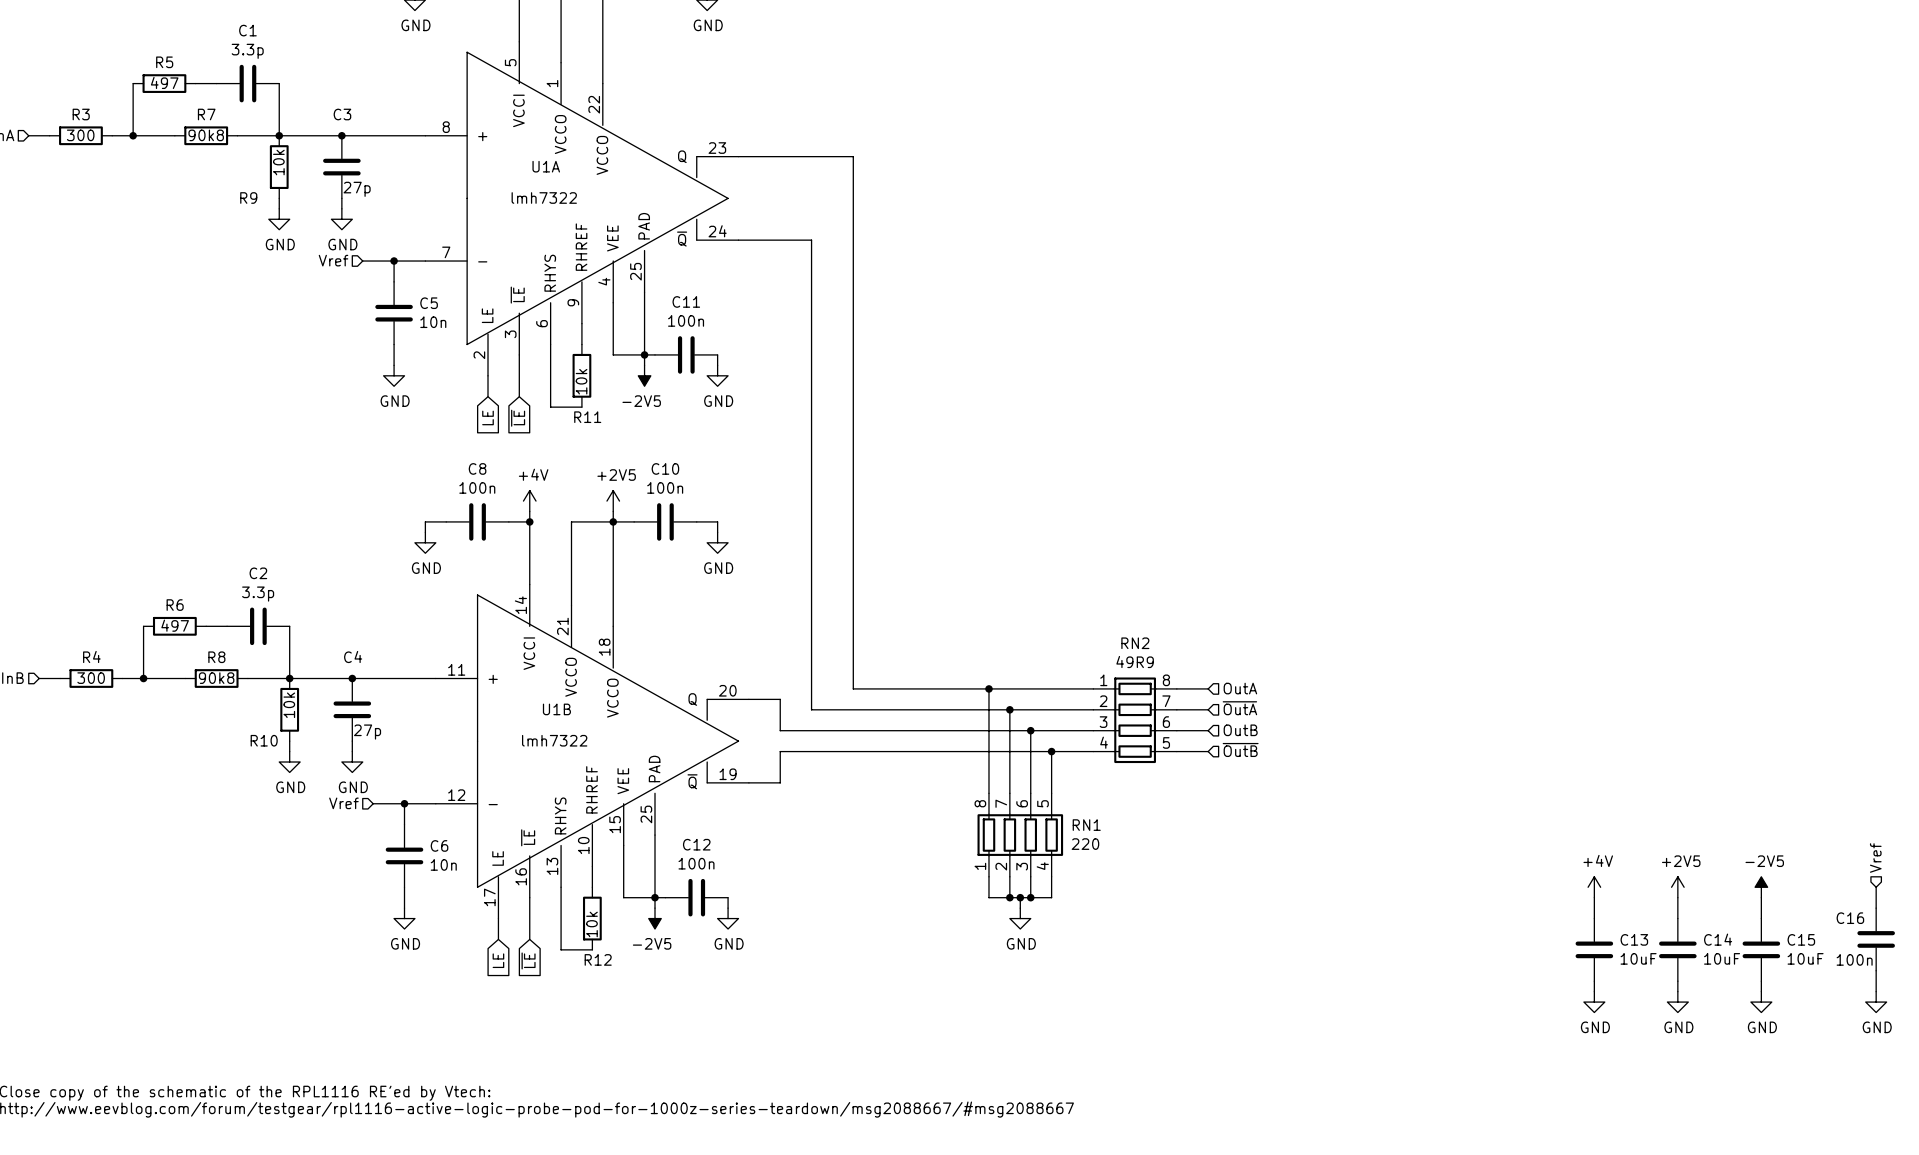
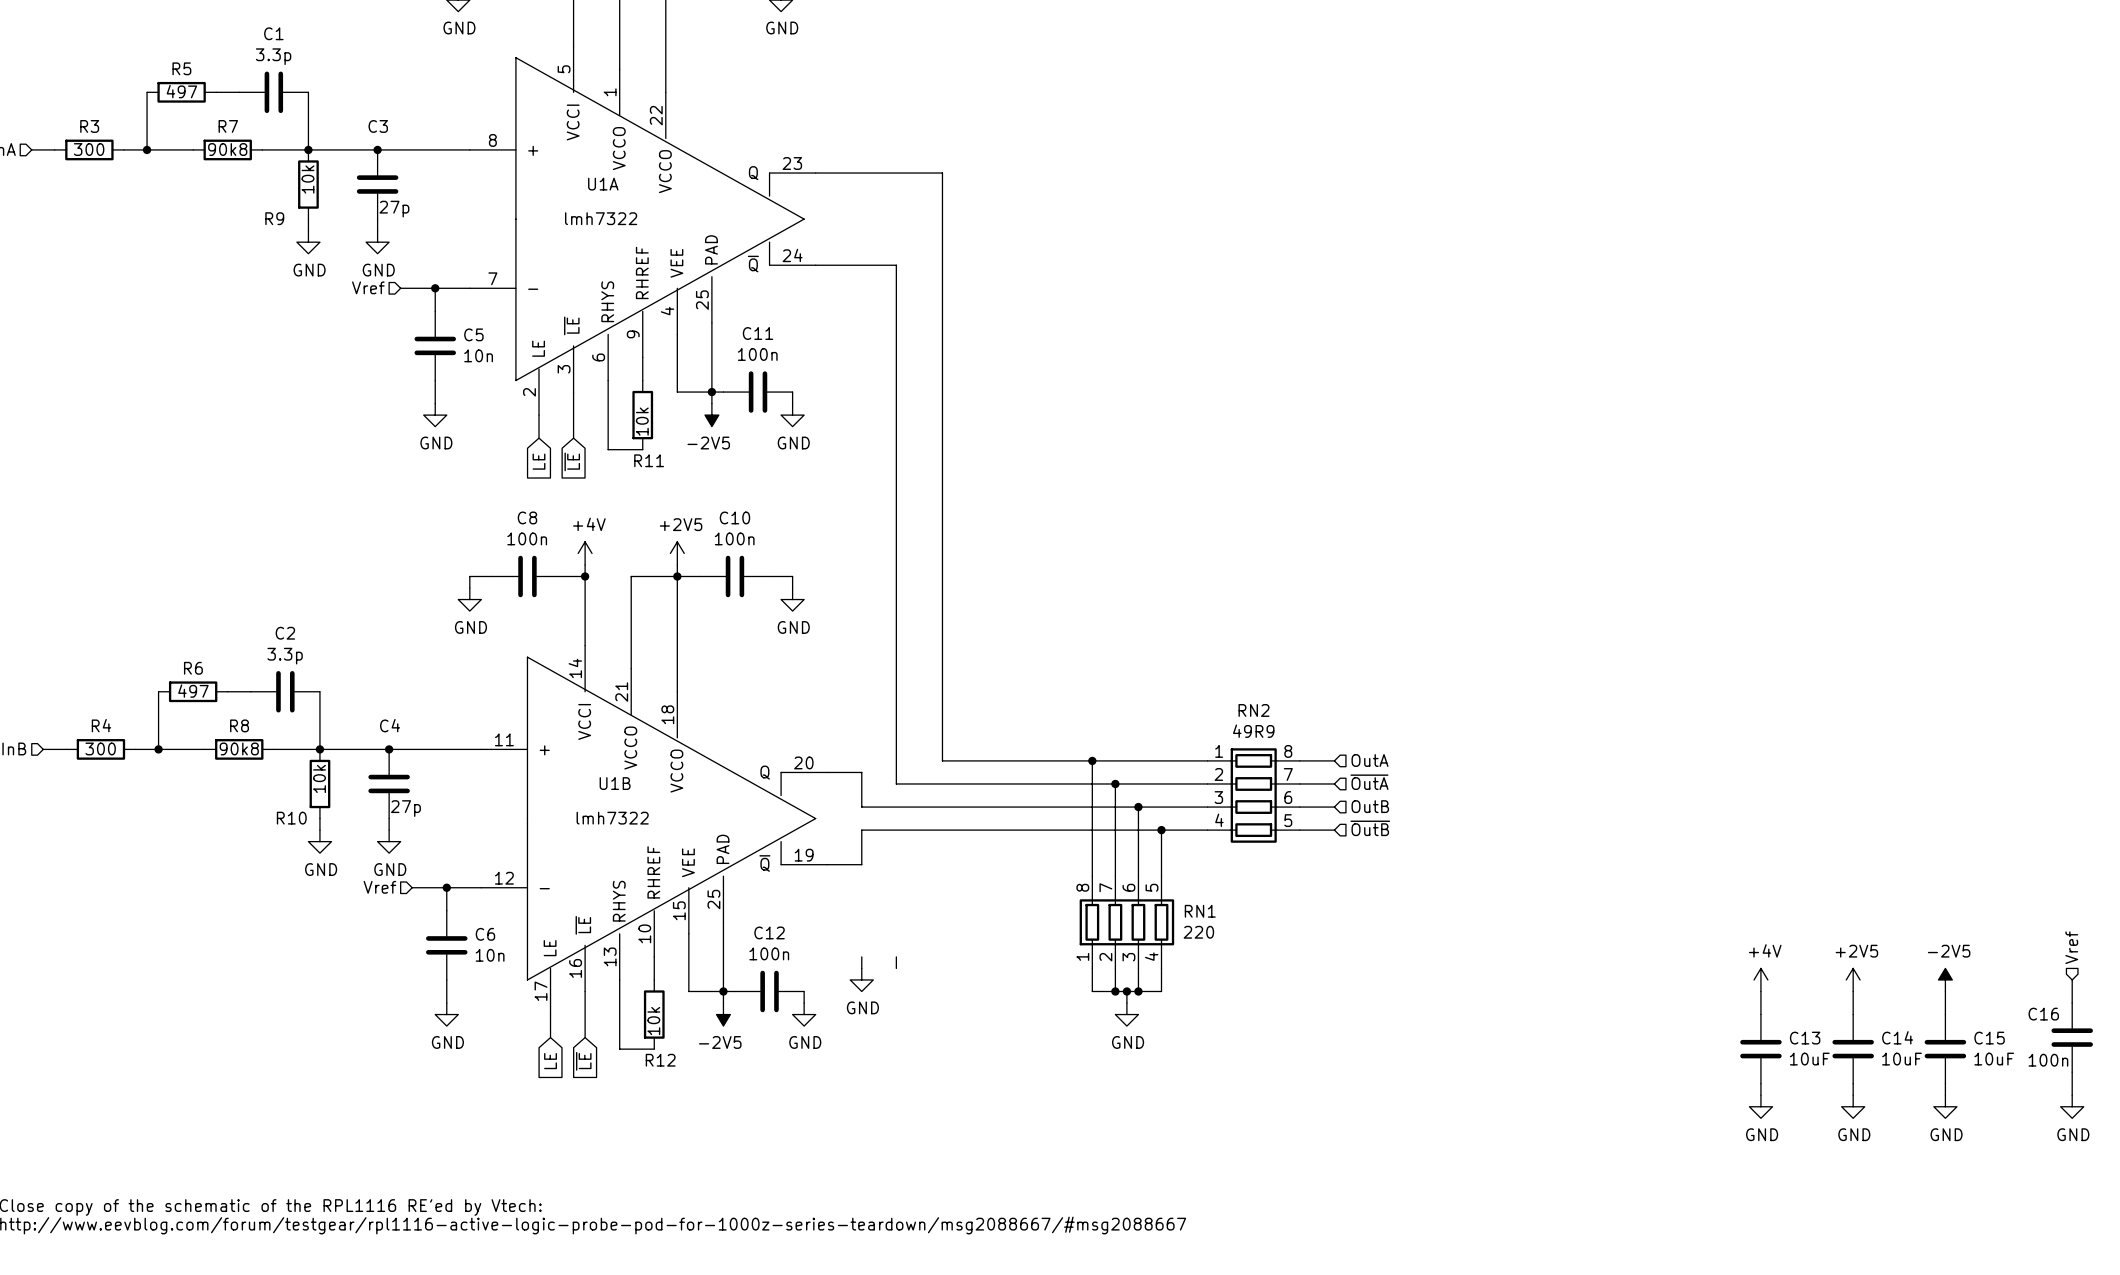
wire: none -> (861, 956) (861, 968)
wire: none -> (896, 956) (896, 968)
power symbol: none -> GND (861, 979)

